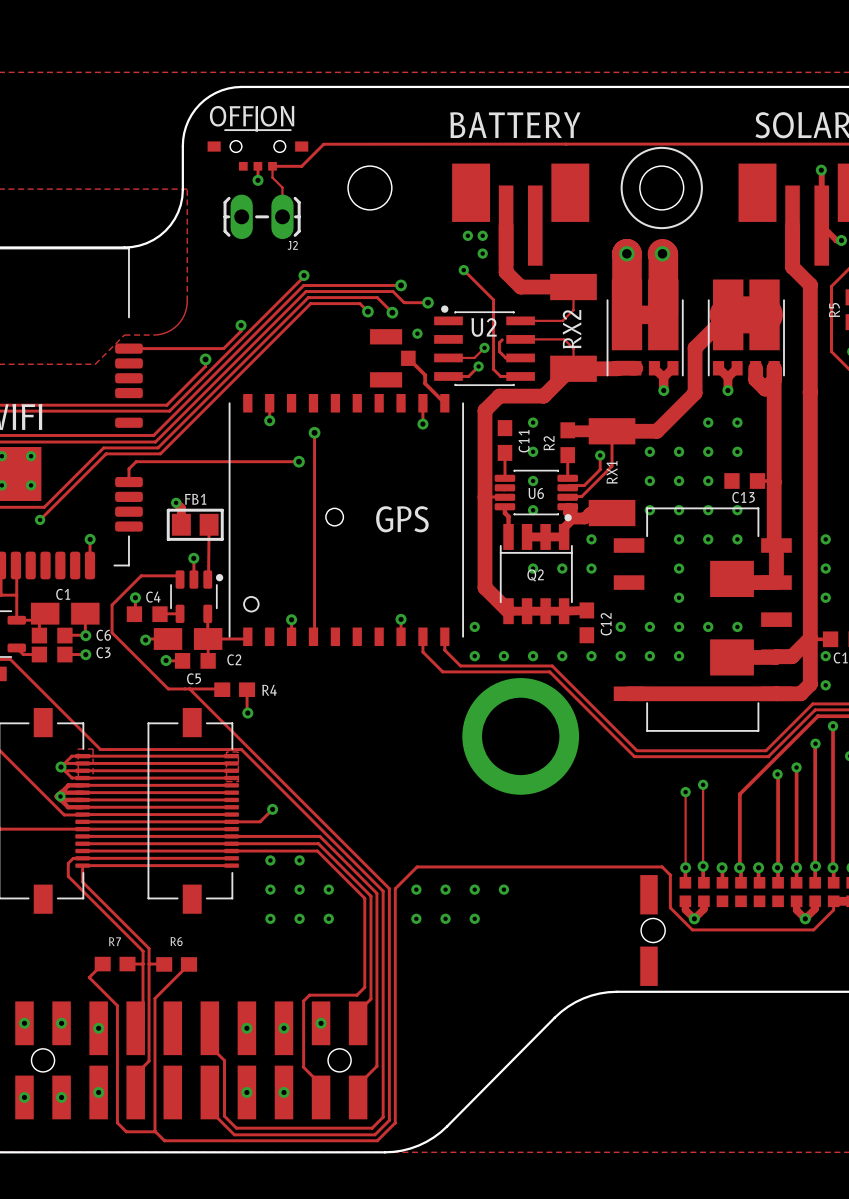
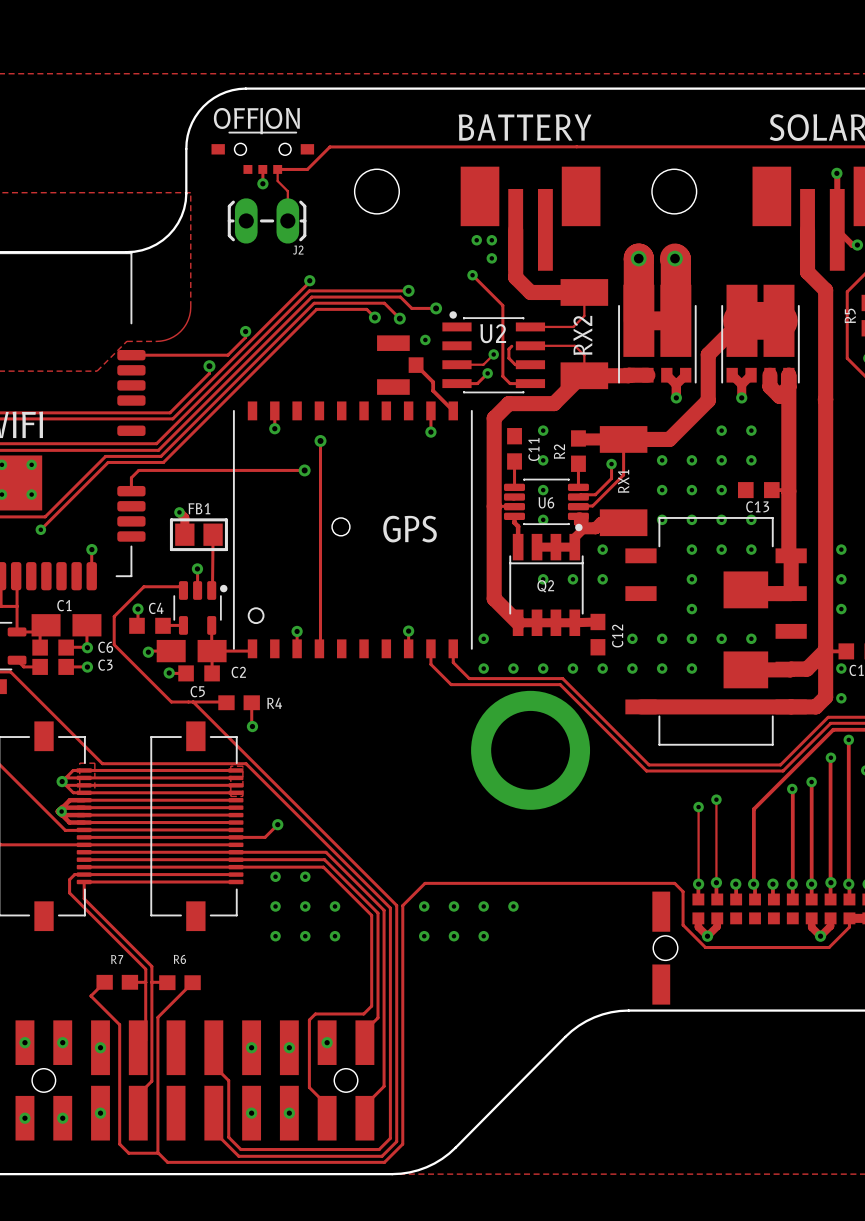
drawing: [620, 146, 703, 230] -> none

